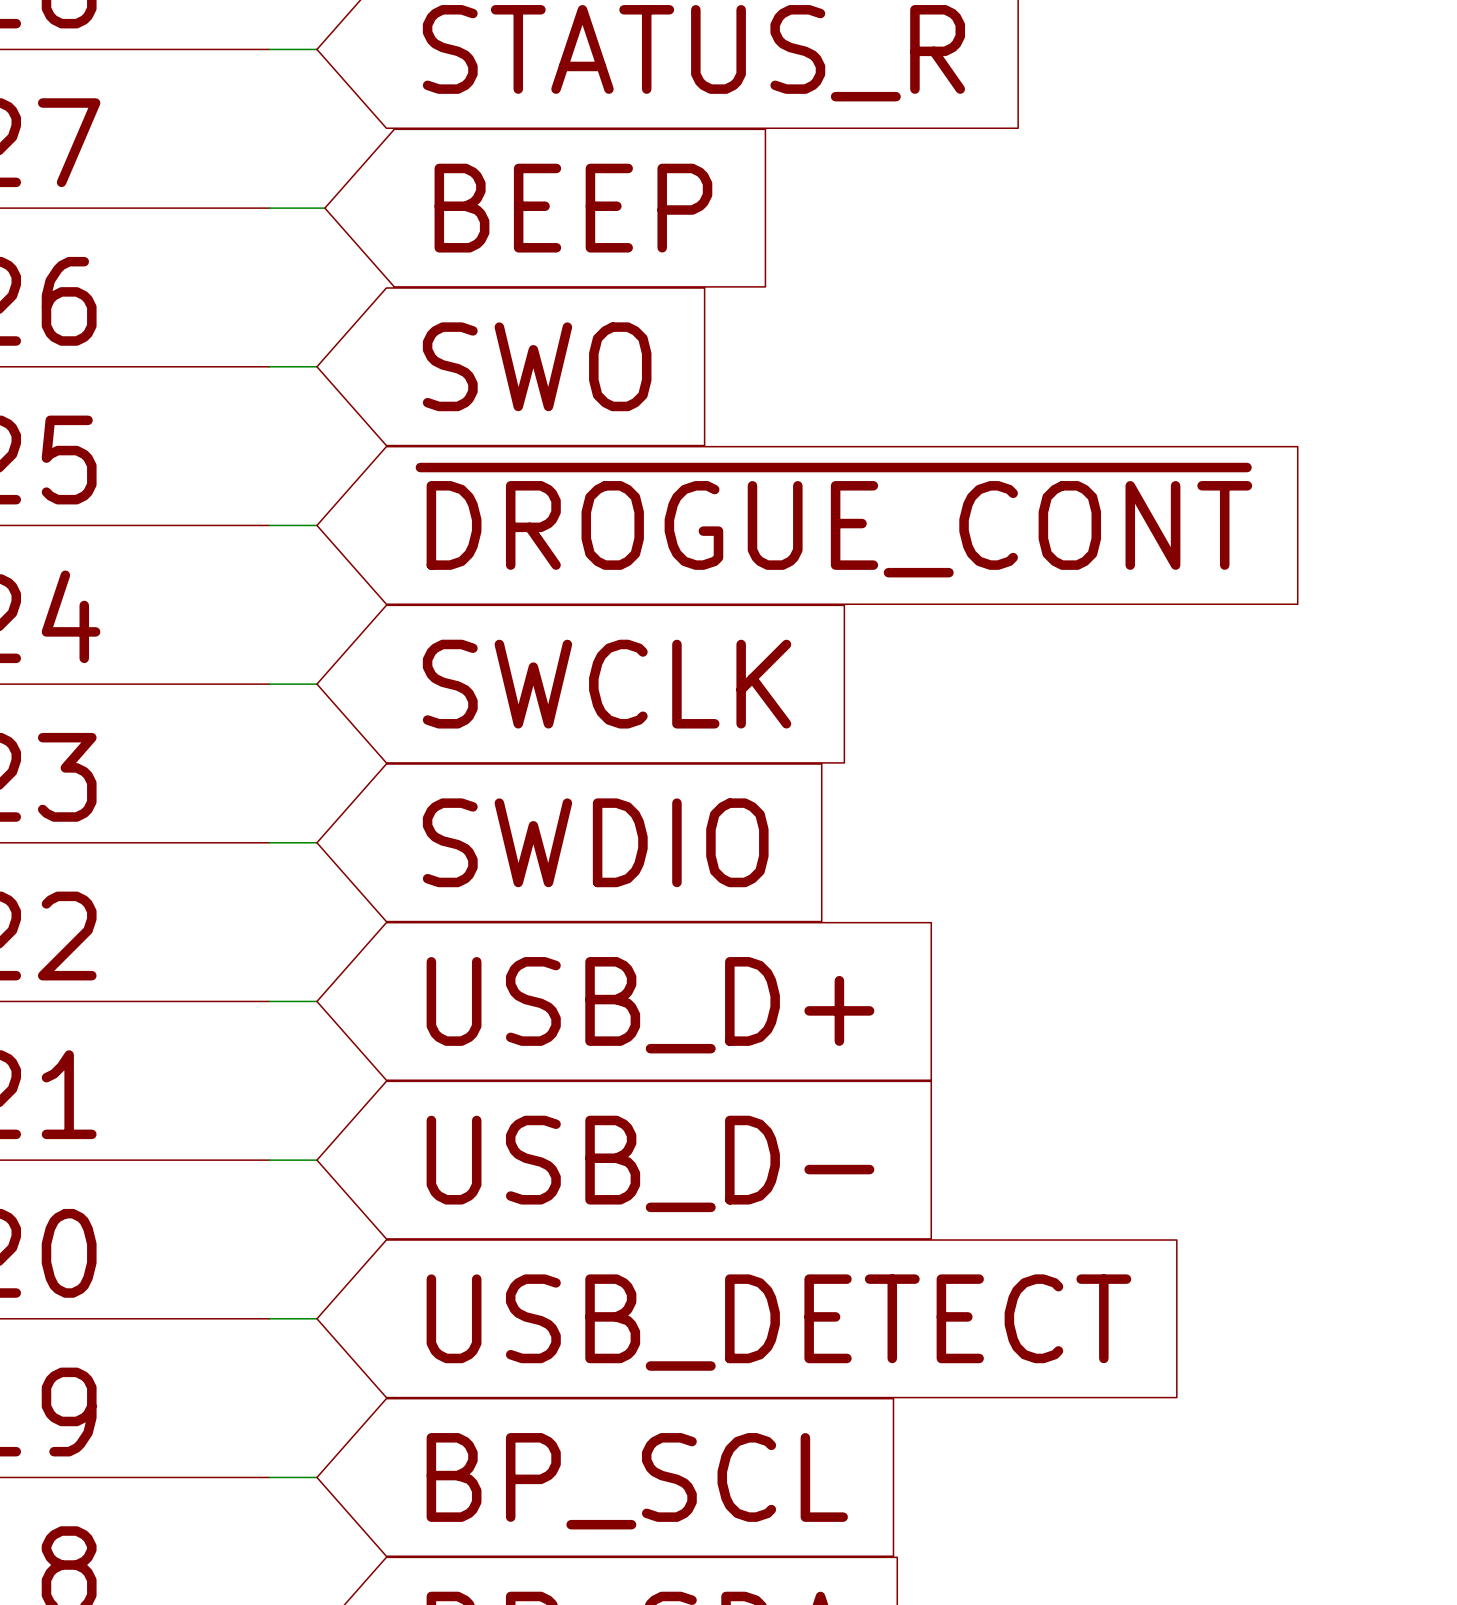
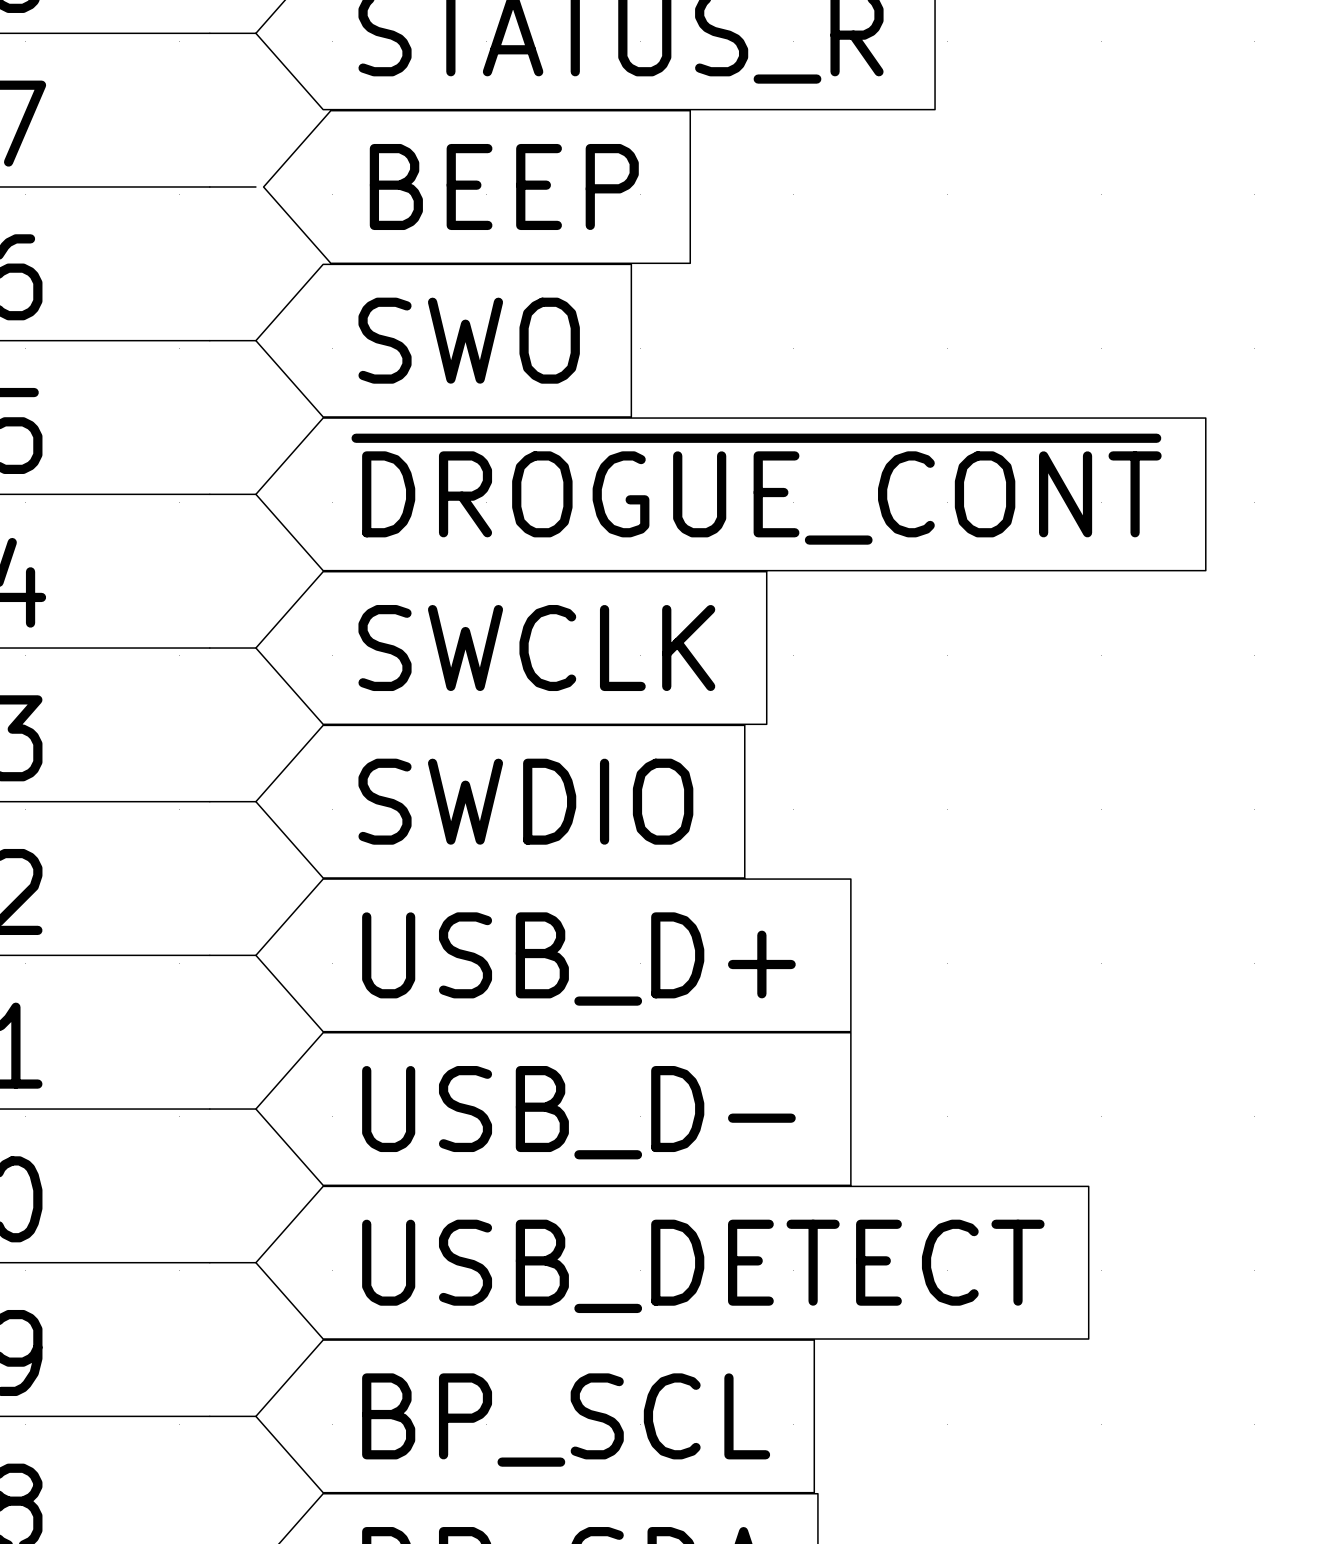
wire: (316, 208) (324, 208) -> none

